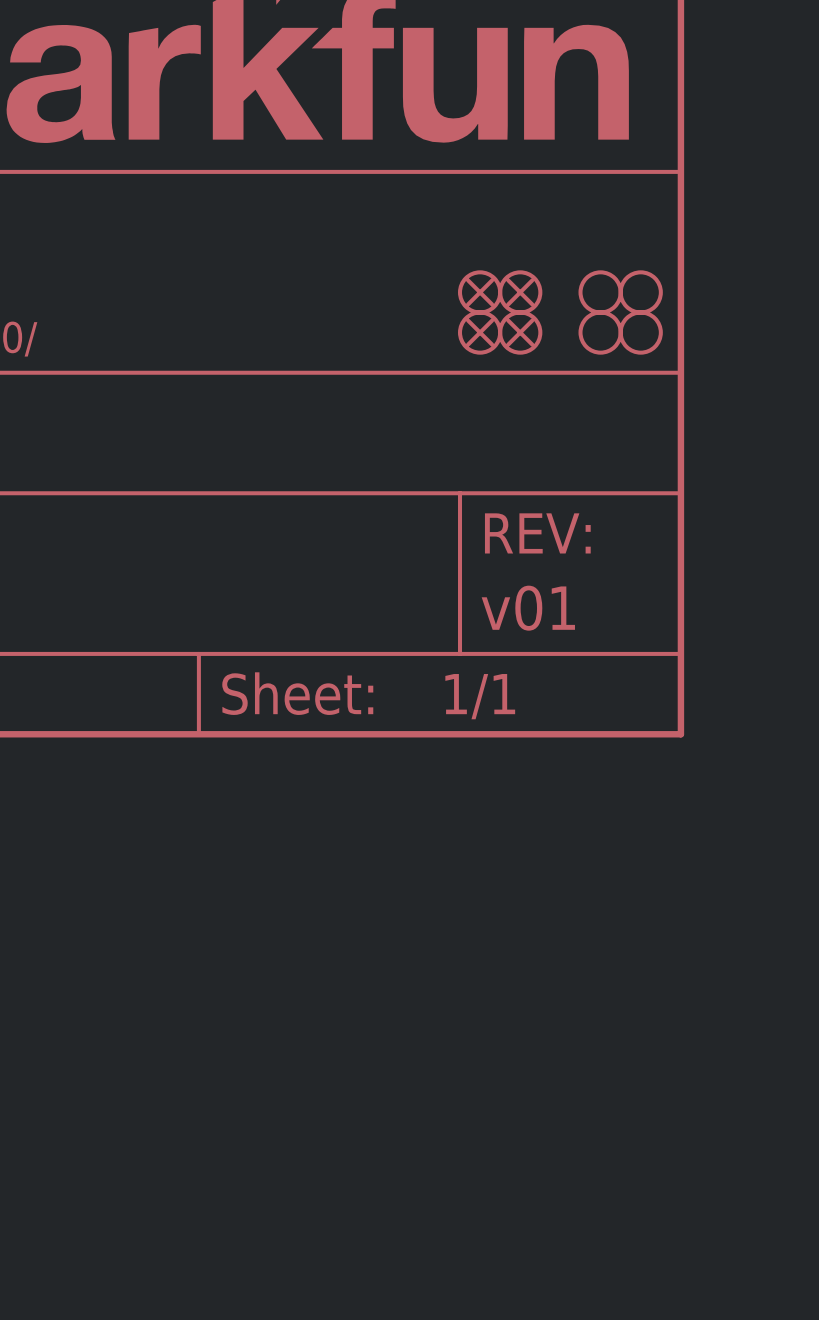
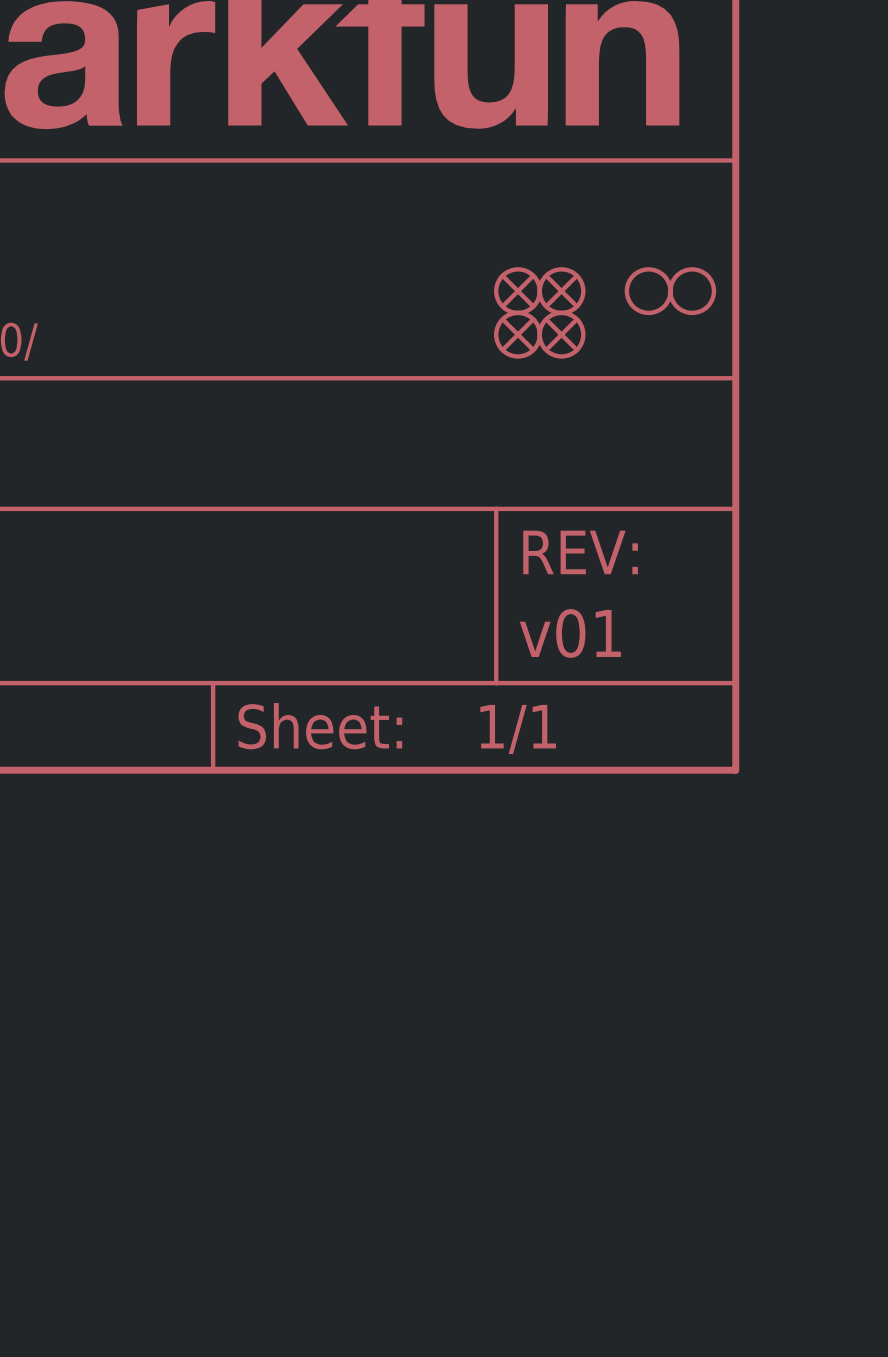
part: (600, 332) -> none
part: (640, 332) -> none

